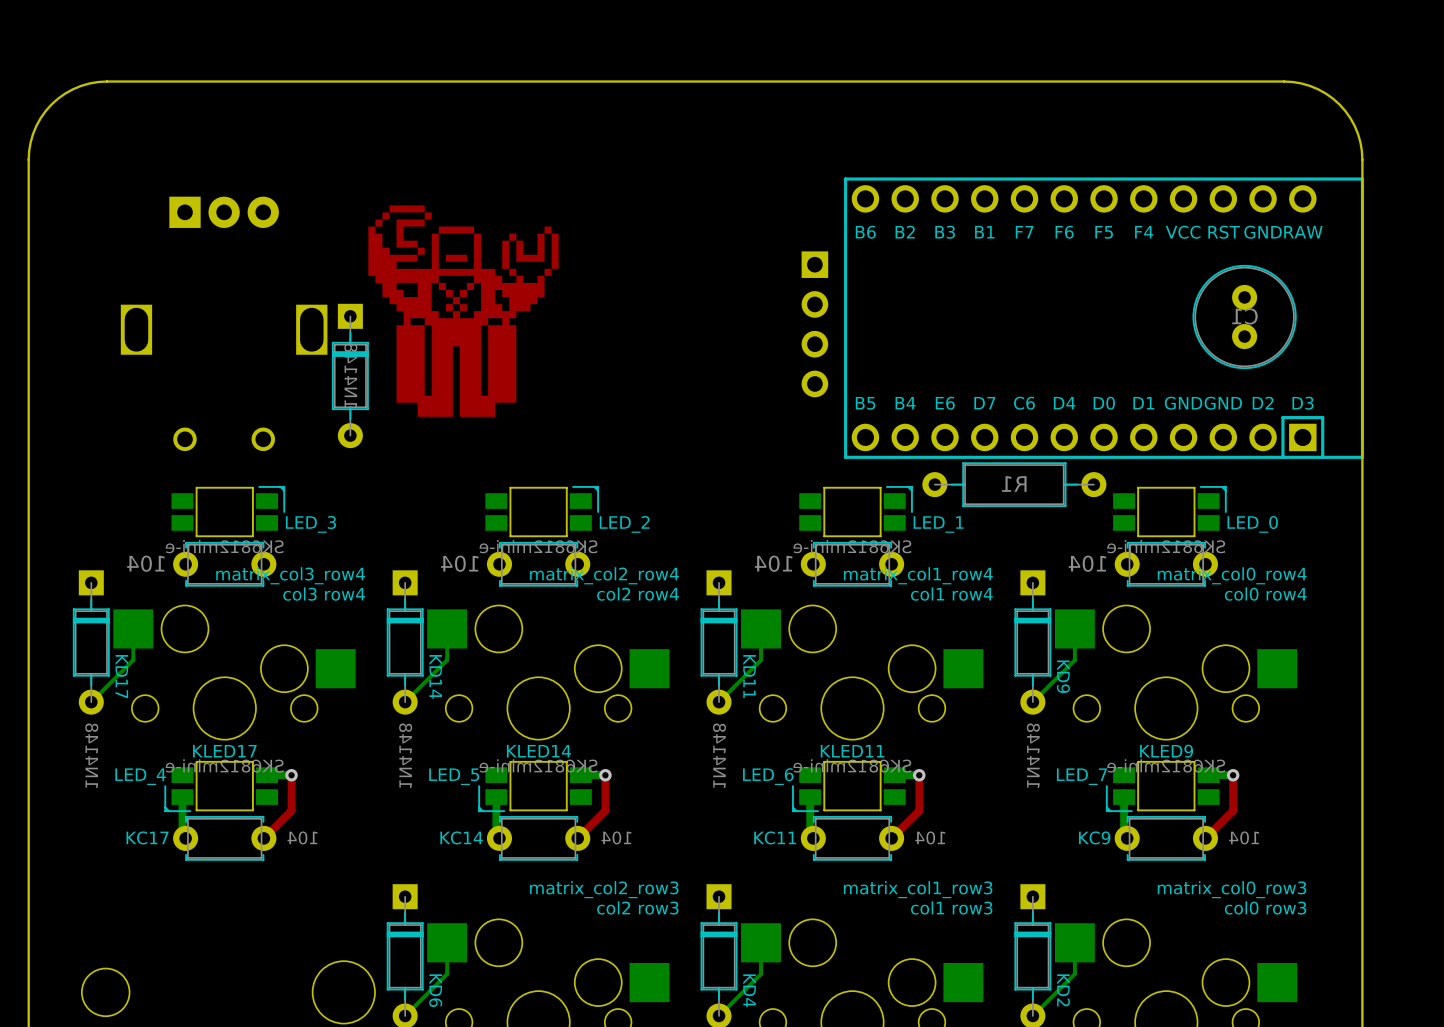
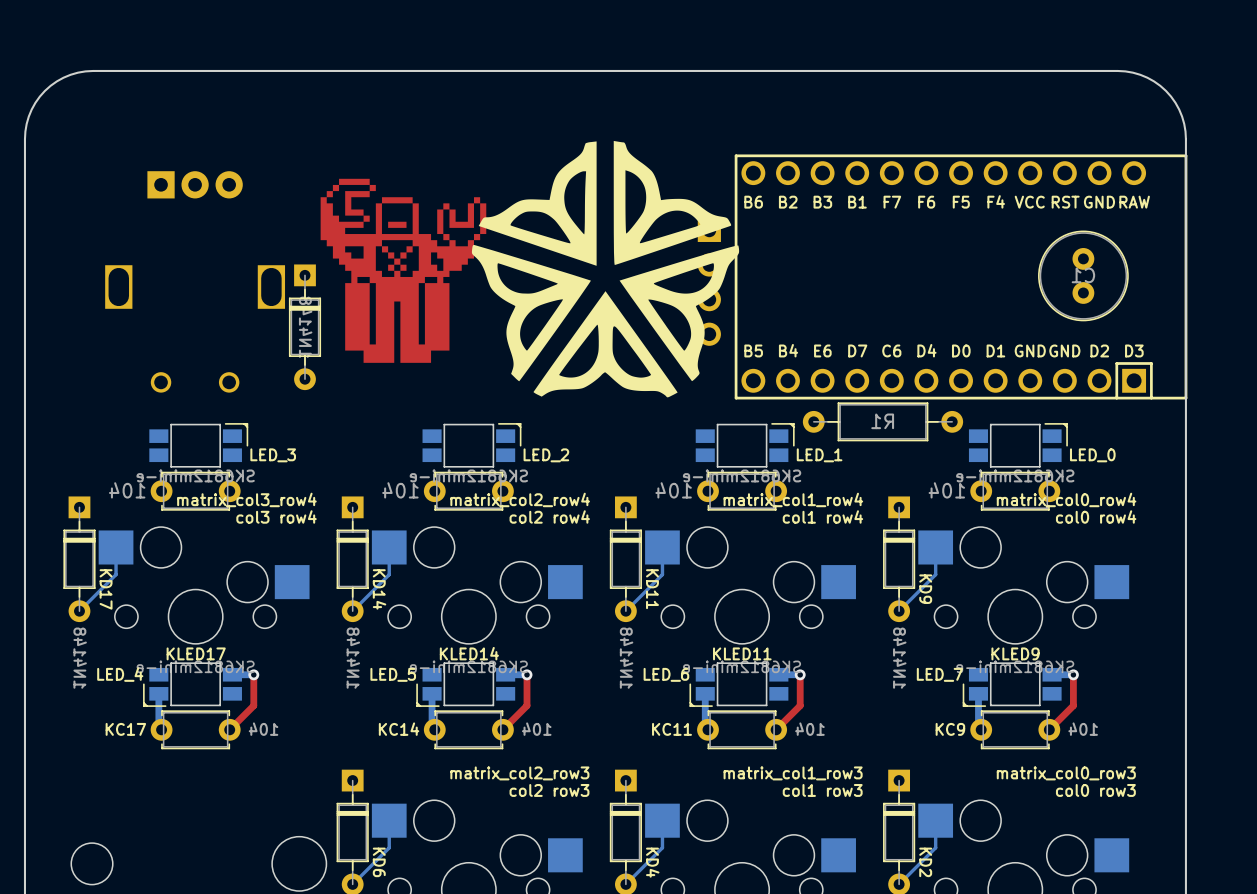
drawing: none -> [471, 140, 740, 398]

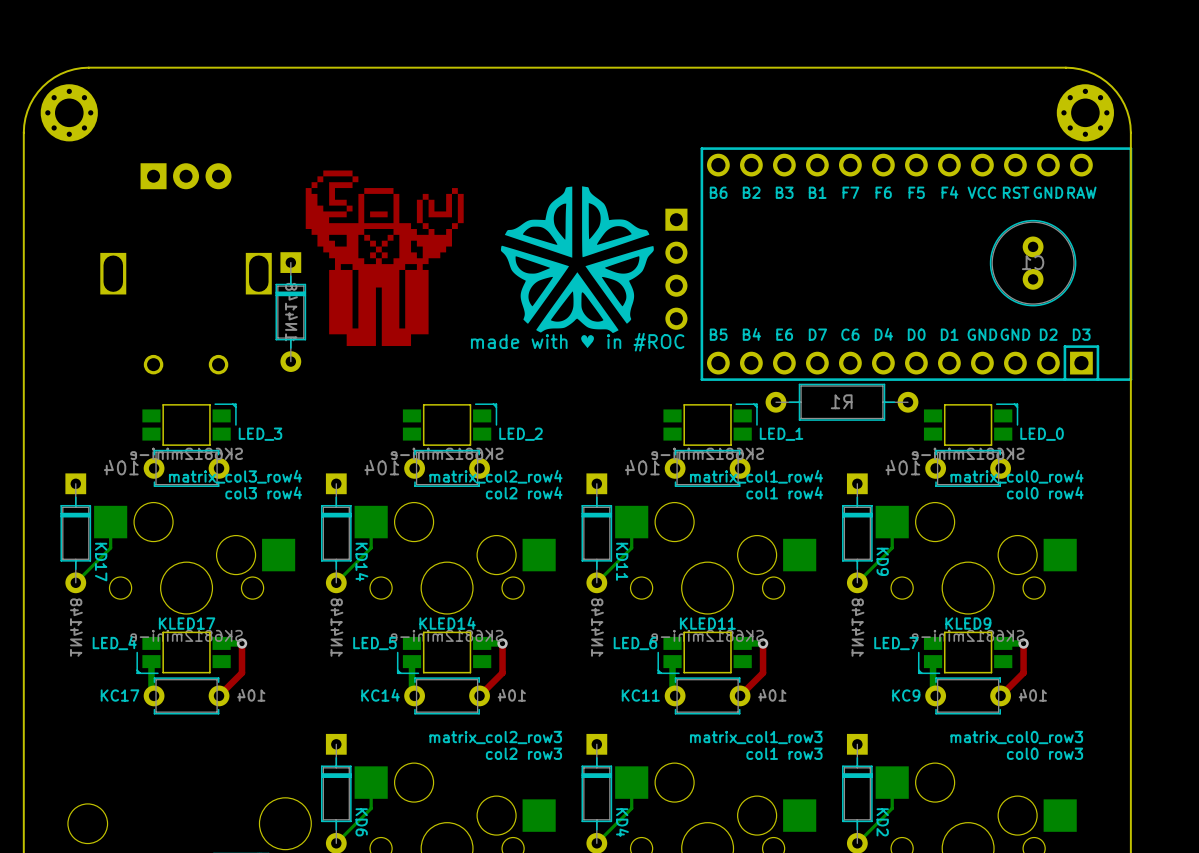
part: none -> (69, 112)
part: none -> (1085, 112)
drawing shape: [471, 140, 740, 398] -> [500, 186, 654, 333]
text: none -> made with ♥ in #ROC (577, 342)

